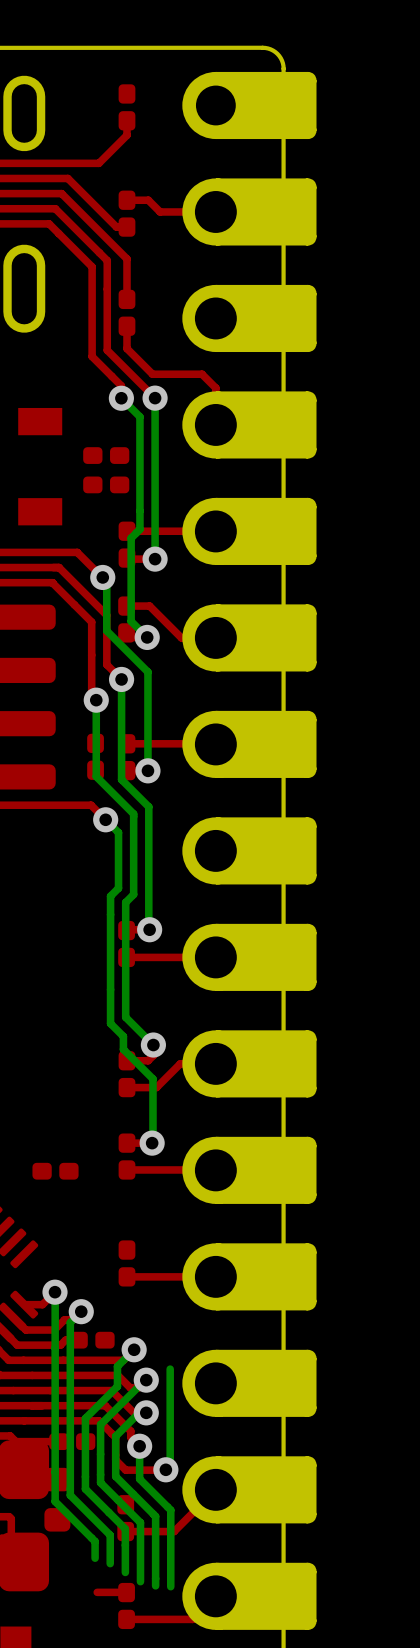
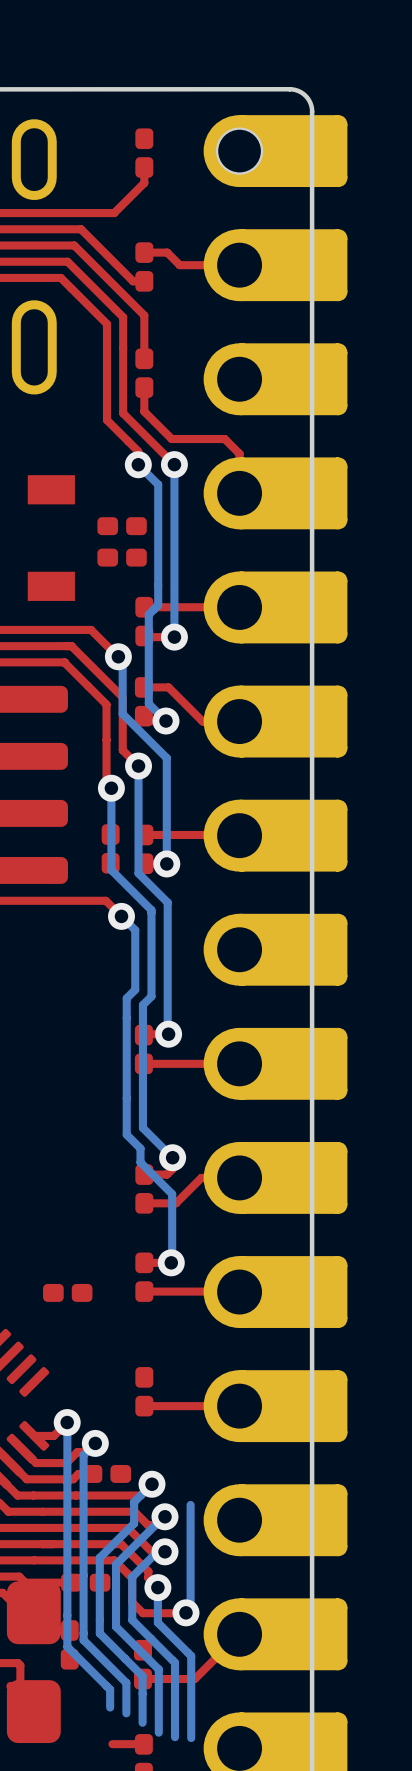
part footprint: [44, 1467, 71, 1532] -> [60, 1620, 79, 1670]

